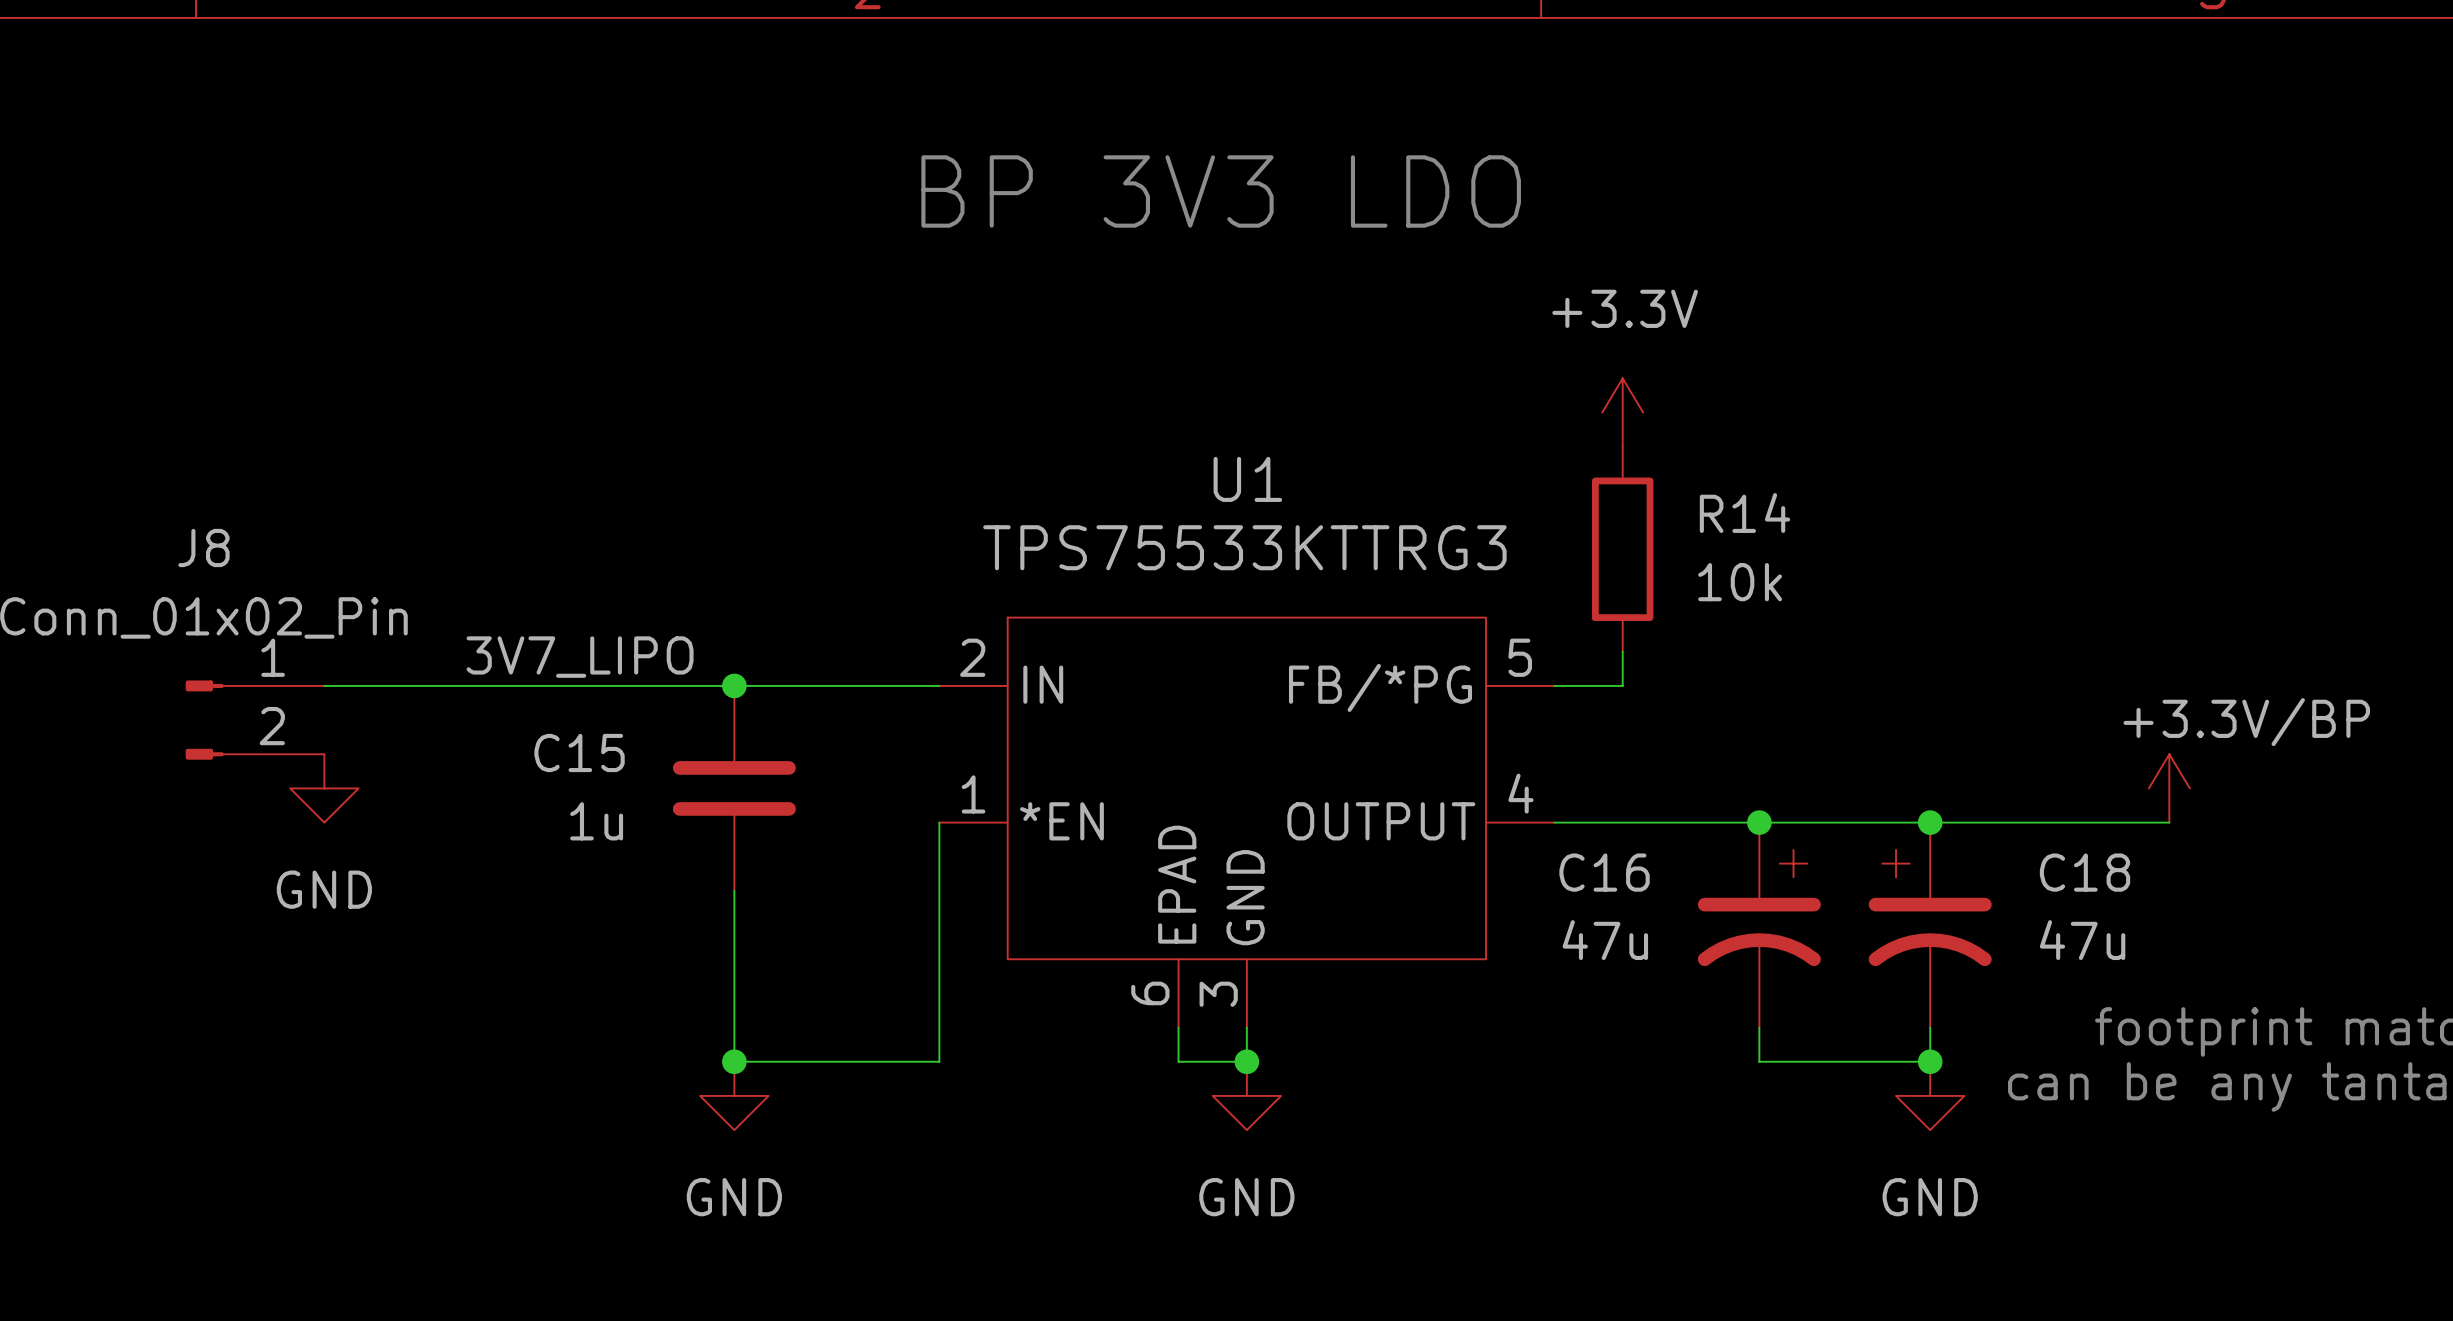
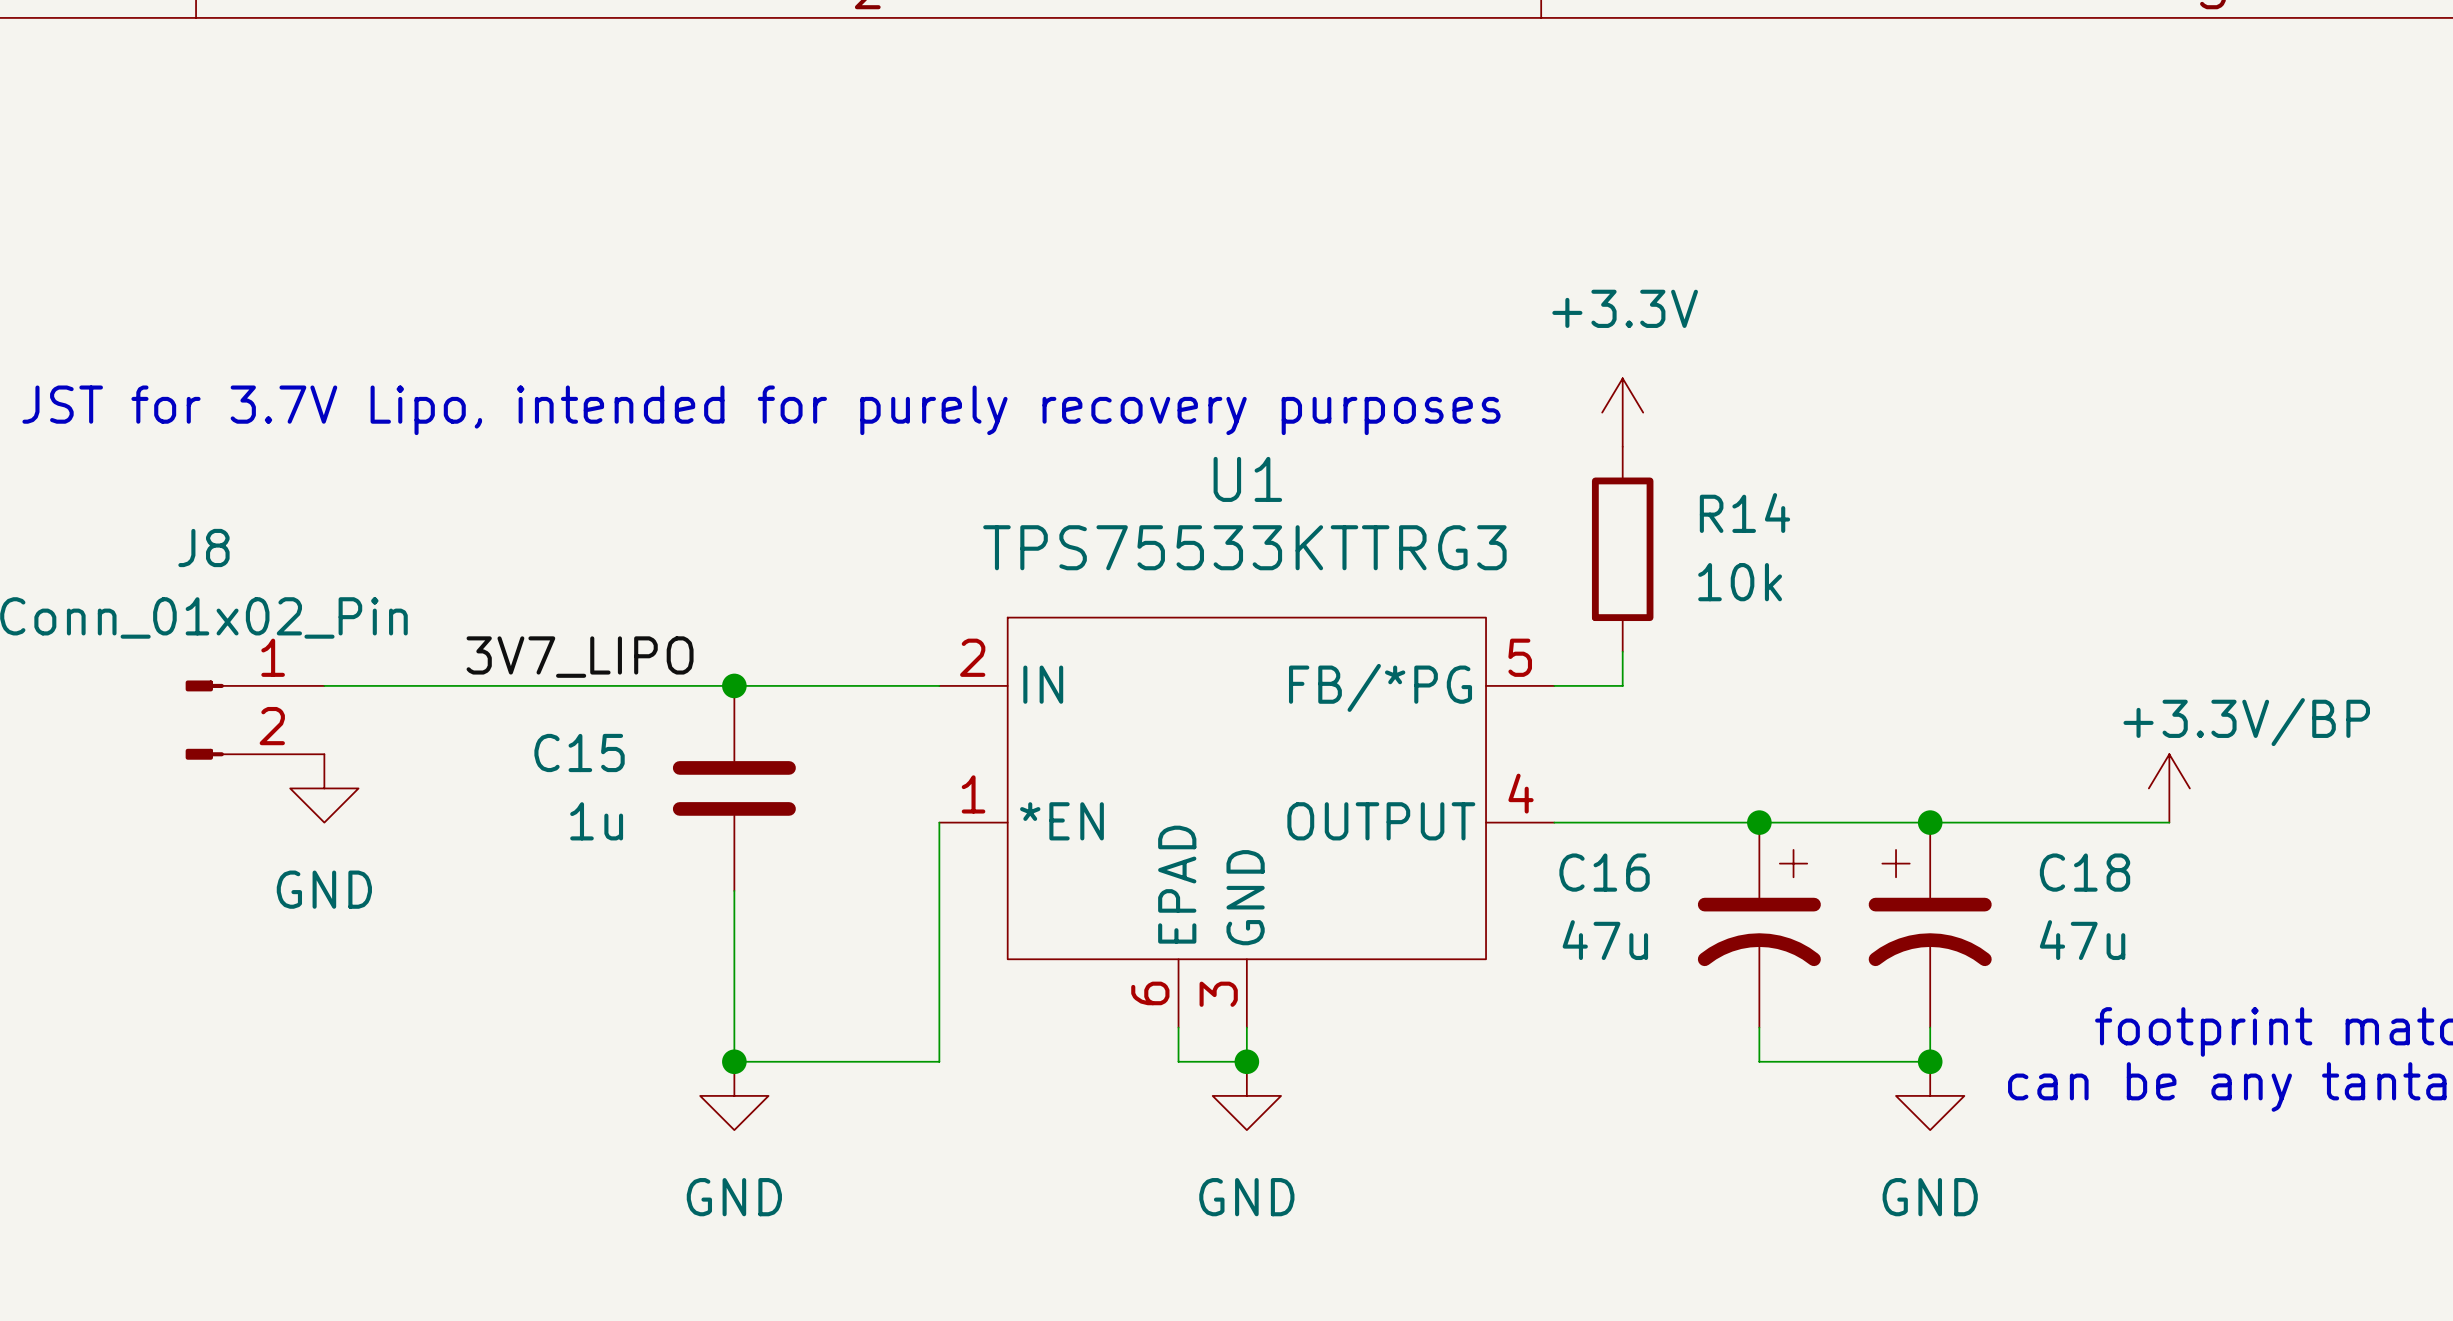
text: BP 3V3 LDO (1221, 191) -> none
text: none -> JST for 3.7V Lipo, intended for purely recovery purposes (761, 410)

